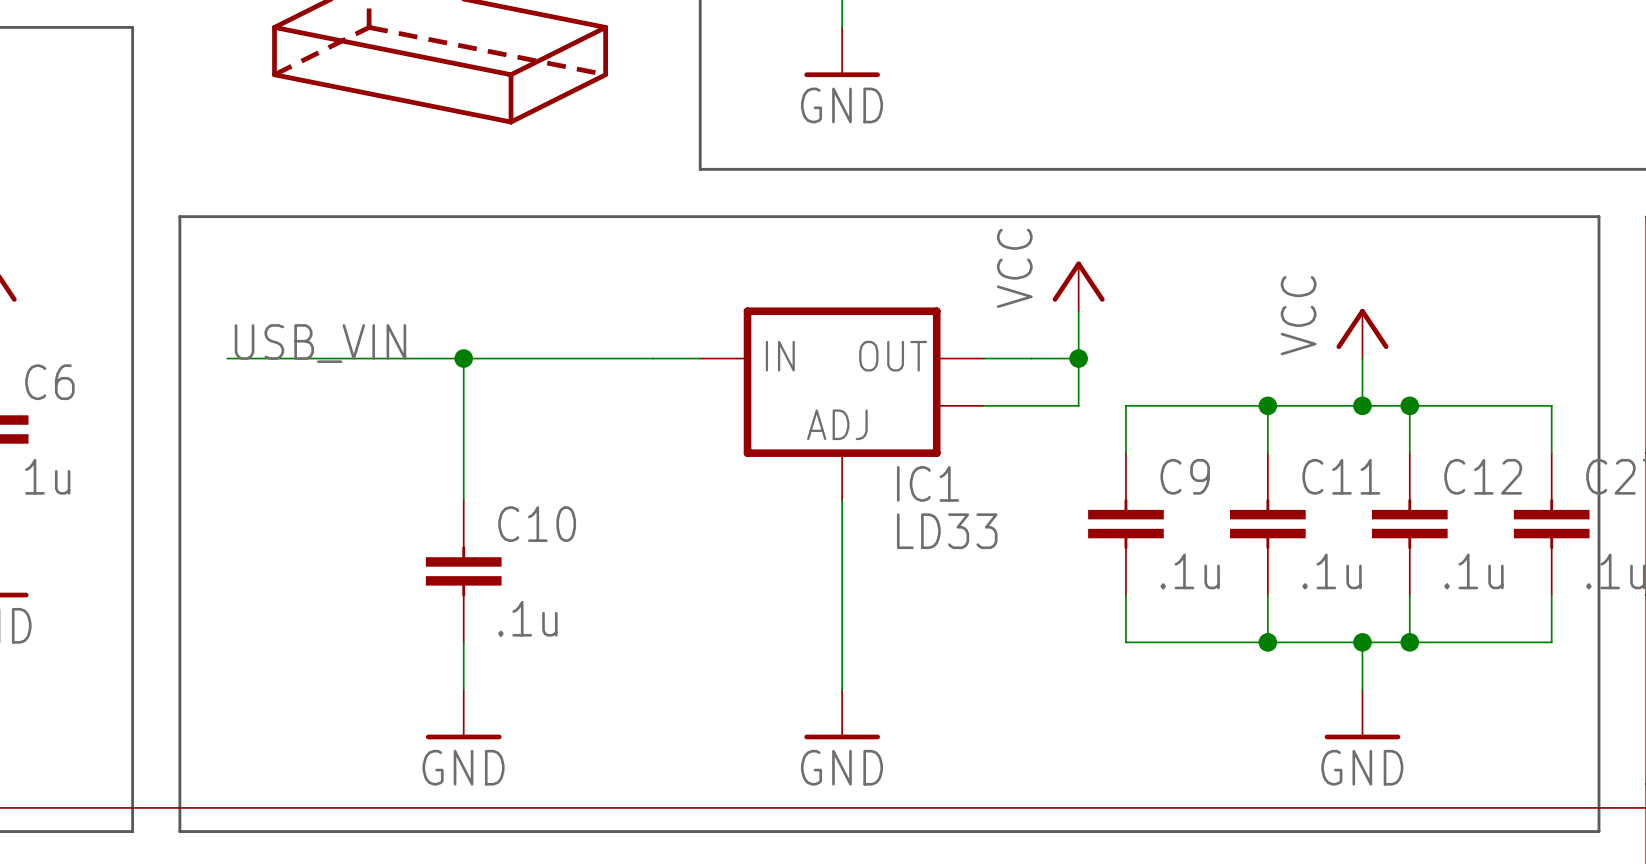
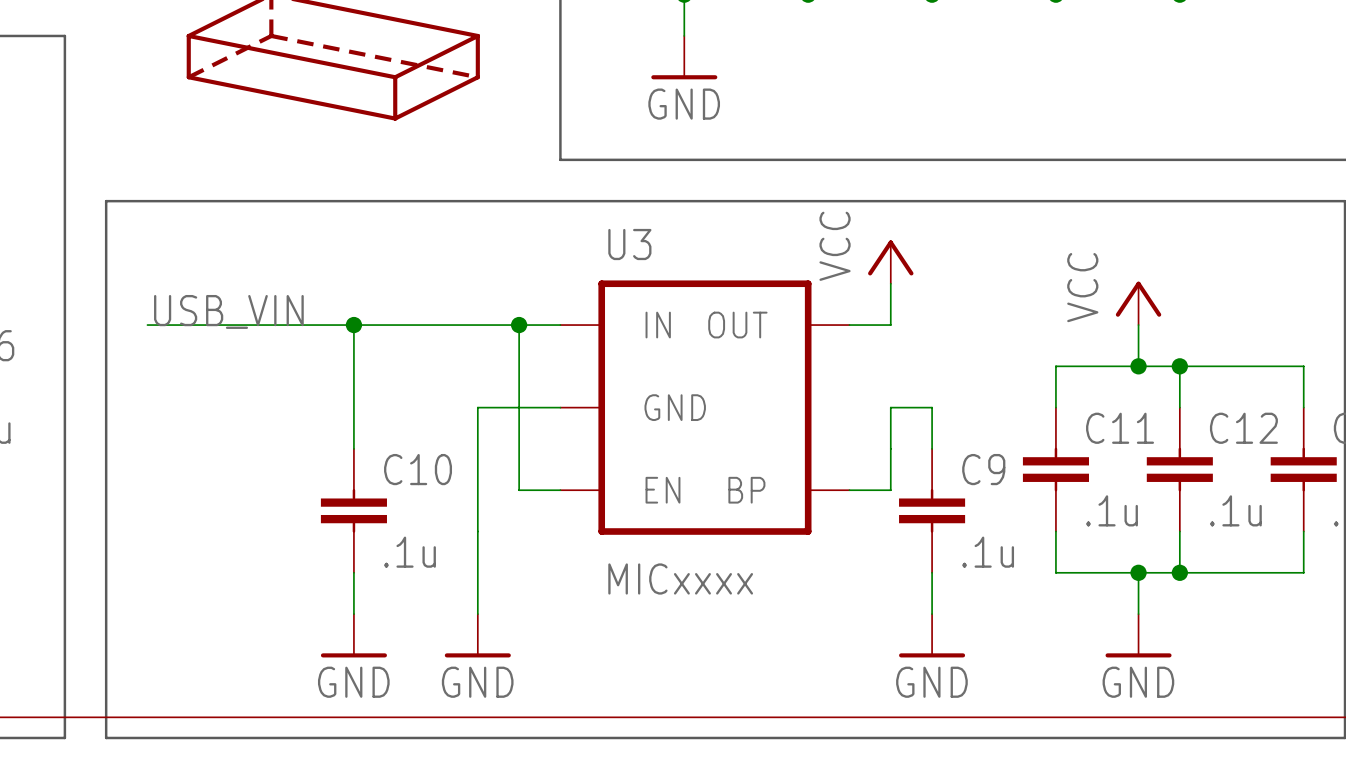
wire: none -> (519, 325) (519, 490) (560, 490)
junction: none -> (519, 325)
wire: (1078, 358) (1078, 405) (984, 405) -> none
junction: (1078, 358) -> none
IC1: LD33 (842, 403) -> none
wire: (1267, 405) (1125, 405) (1125, 453) -> none
junction: (1267, 405) -> none
wire: none -> (560, 407) (477, 407) (477, 614)
U3: none -> MICxxxx (704, 407)
wire: (842, 500) (842, 689) -> none
wire: none -> (932, 448) (932, 407) (890, 407) (890, 490) (849, 490)
C9 position: (1125, 524) -> (932, 510)
wire: (1125, 595) (1125, 642) (1267, 642) -> none
wire: none -> (932, 572) (932, 614)
junction: (1267, 642) -> none
power symbol: none -> GND (477, 635)
power symbol: GND (842, 714) -> none
power symbol: none -> GND (932, 635)

